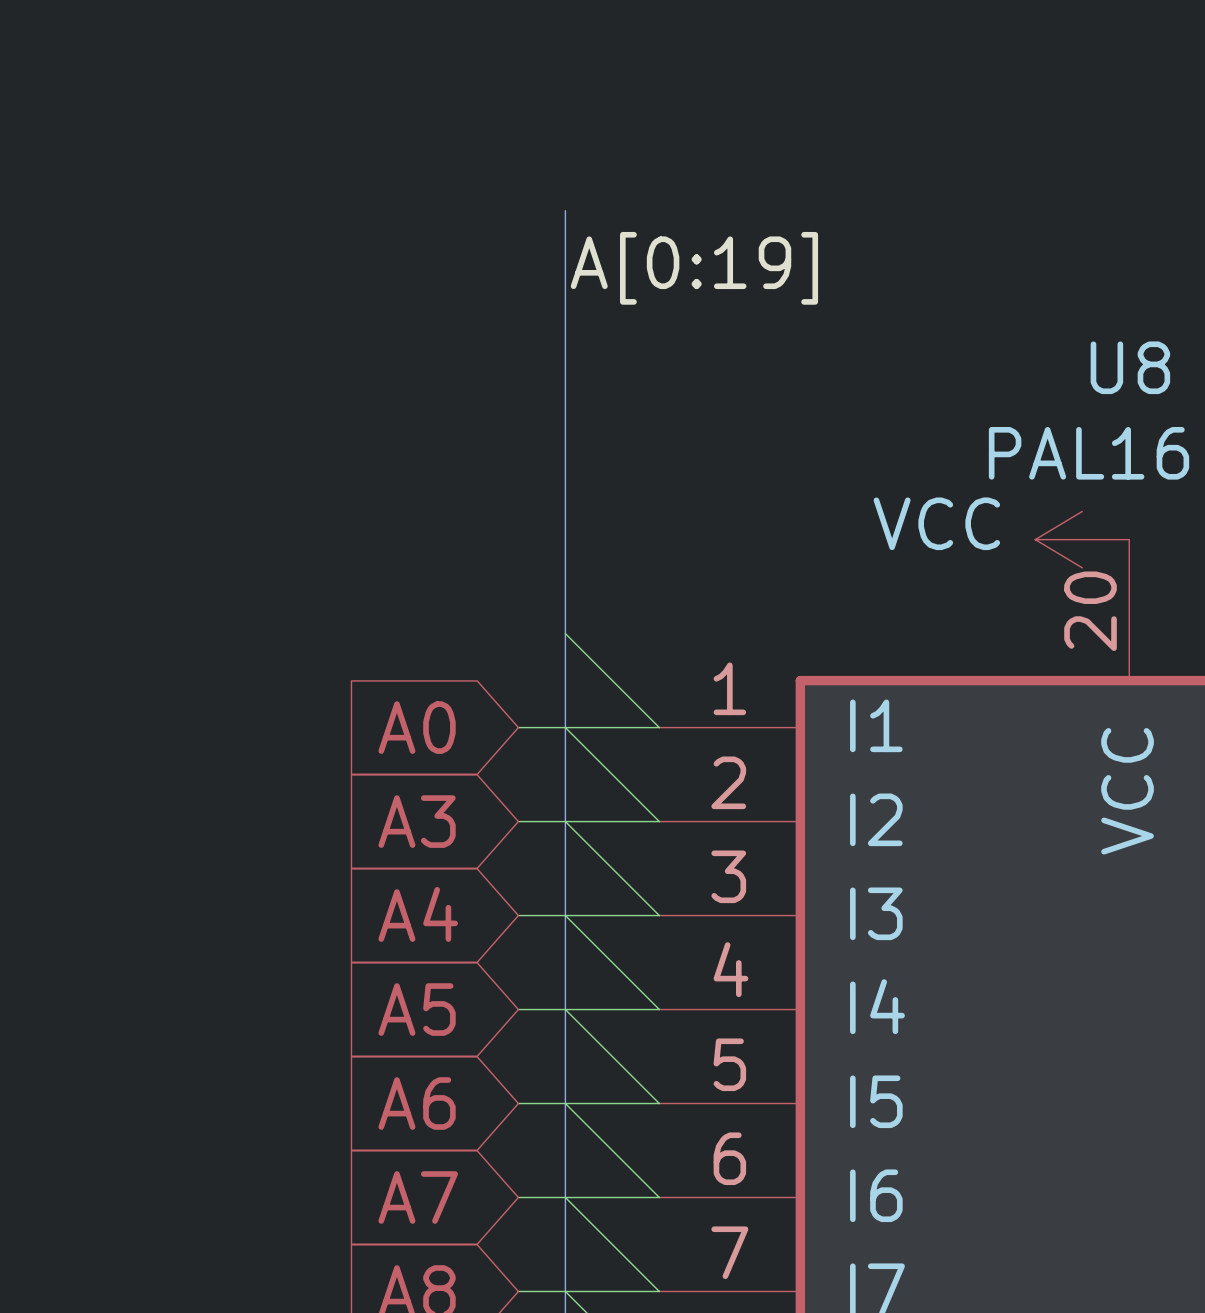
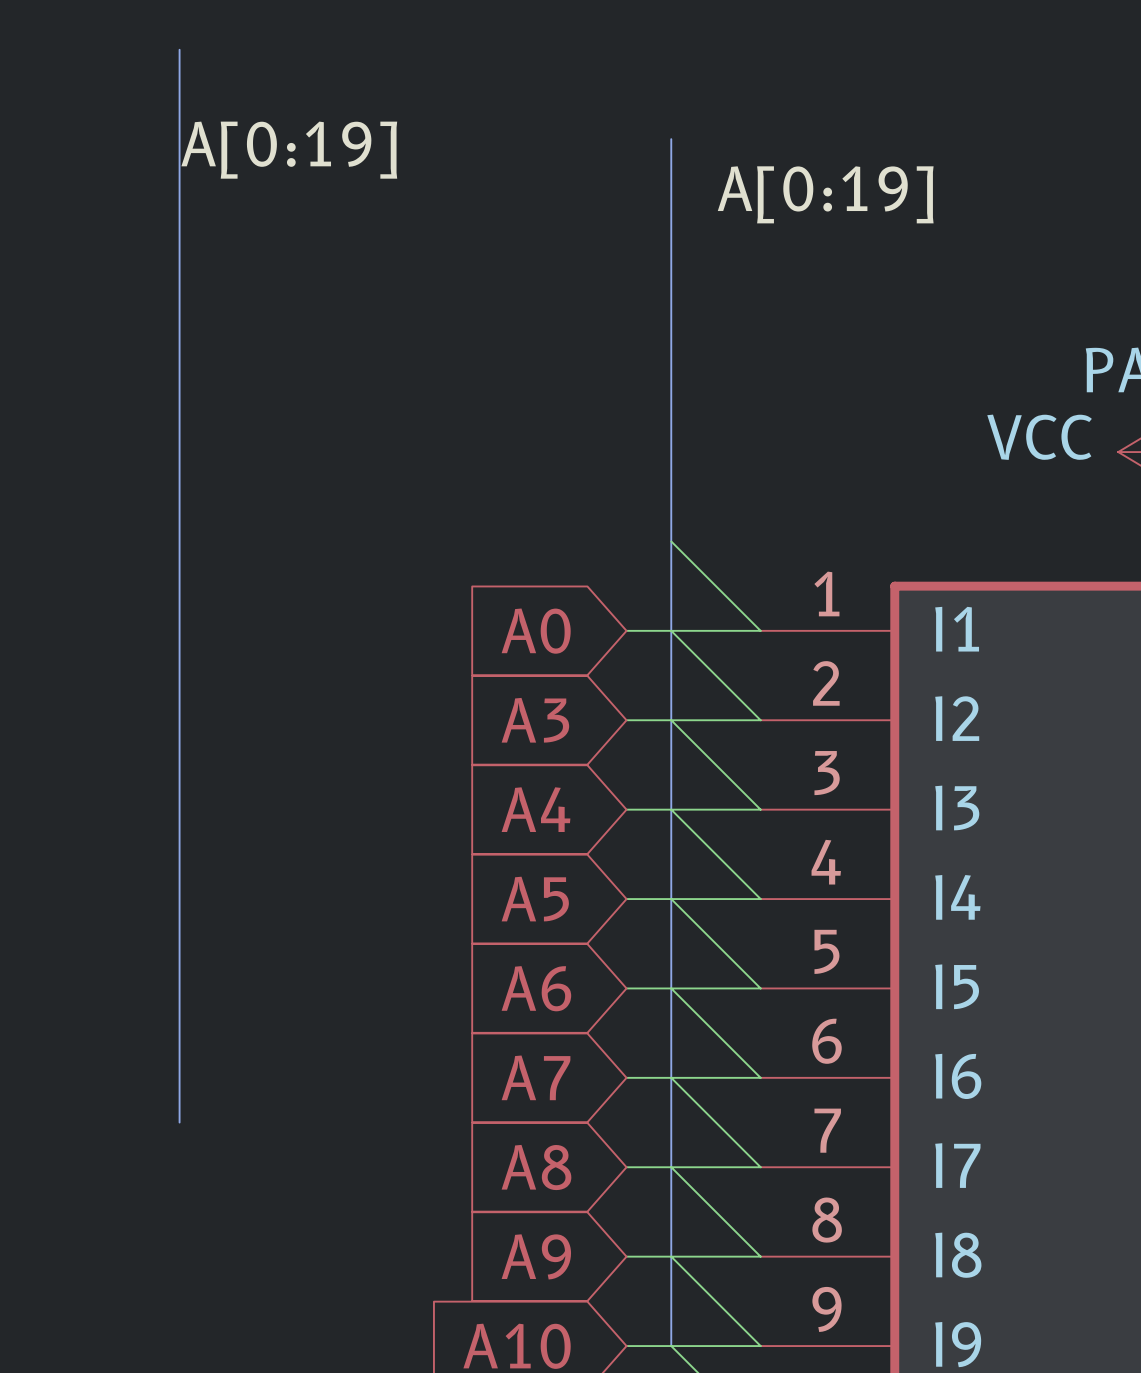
bus: none -> (179, 49) (179, 1122)
label: none -> A[0:19] (289, 150)
label position: A[0:19] (694, 268) -> A[0:19] (825, 194)

